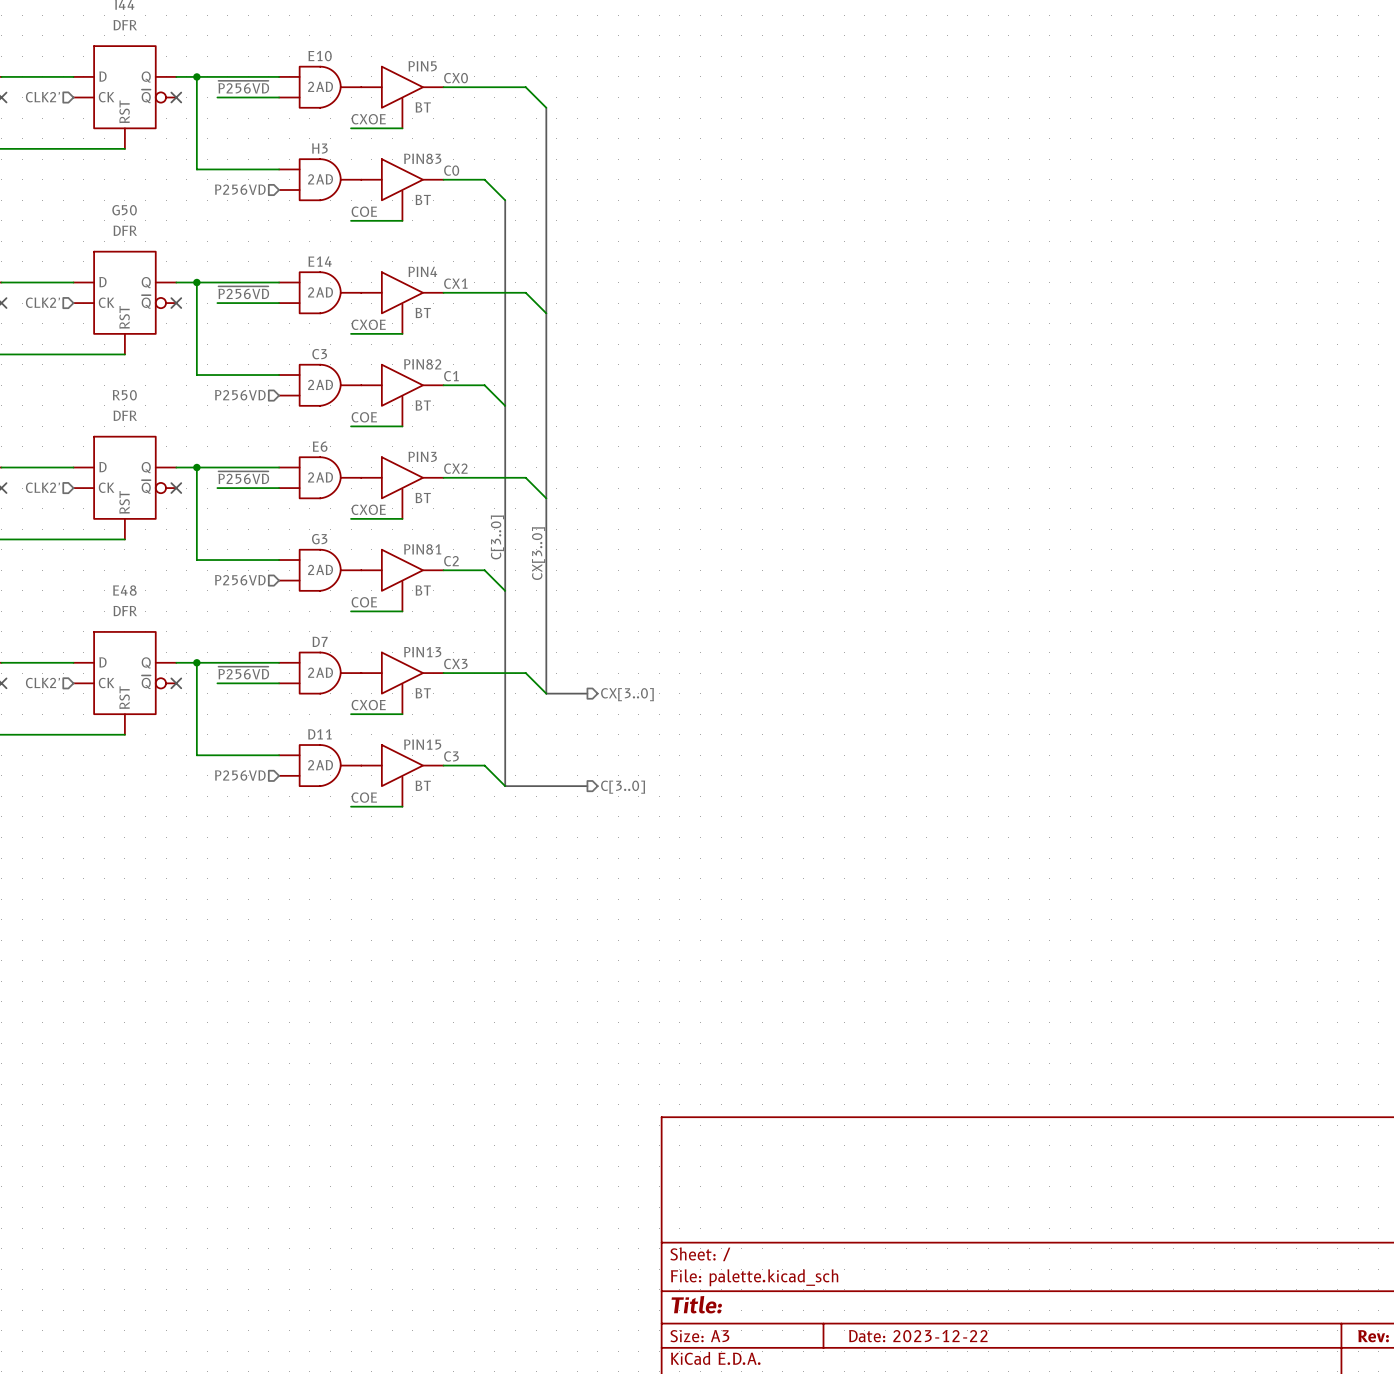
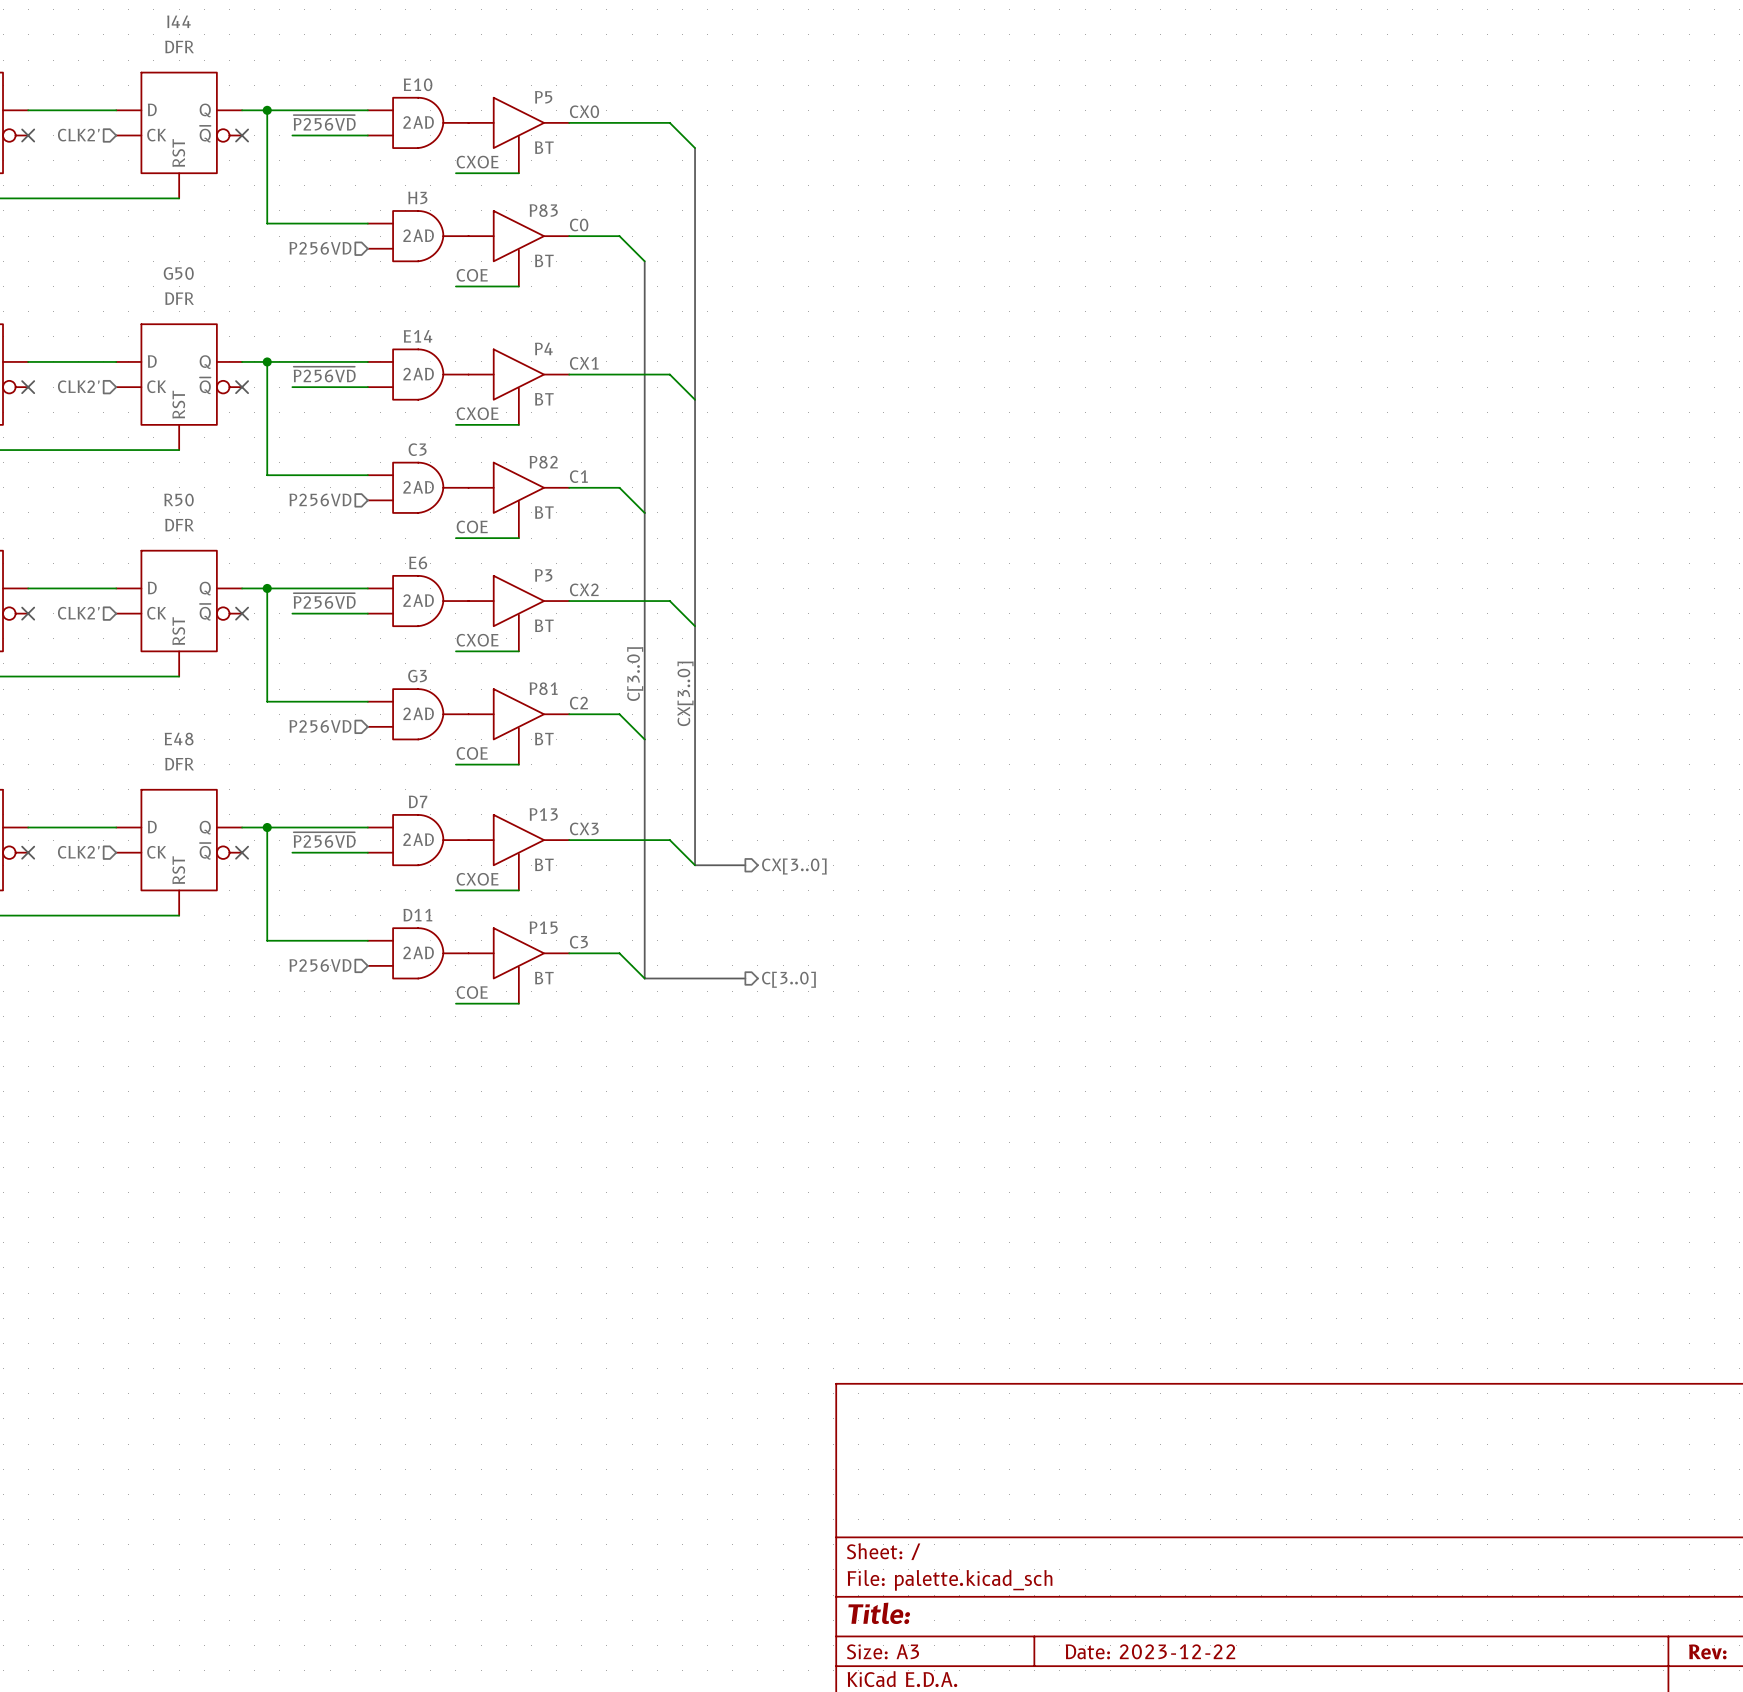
PIN5 name: PIN5 (422, 66) -> P5 (543, 97)
PIN83 name: PIN83 (422, 158) -> P83 (543, 210)
PIN4 name: PIN4 (422, 271) -> P4 (543, 348)
PIN82 name: PIN82 (422, 364) -> P82 (543, 462)
PIN3 name: PIN3 (422, 456) -> P3 (543, 575)
PIN81 name: PIN81 (422, 549) -> P81 (543, 688)
PIN13 name: PIN13 (422, 652) -> P13 (543, 814)
PIN15 name: PIN15 (422, 744) -> P15 (543, 927)

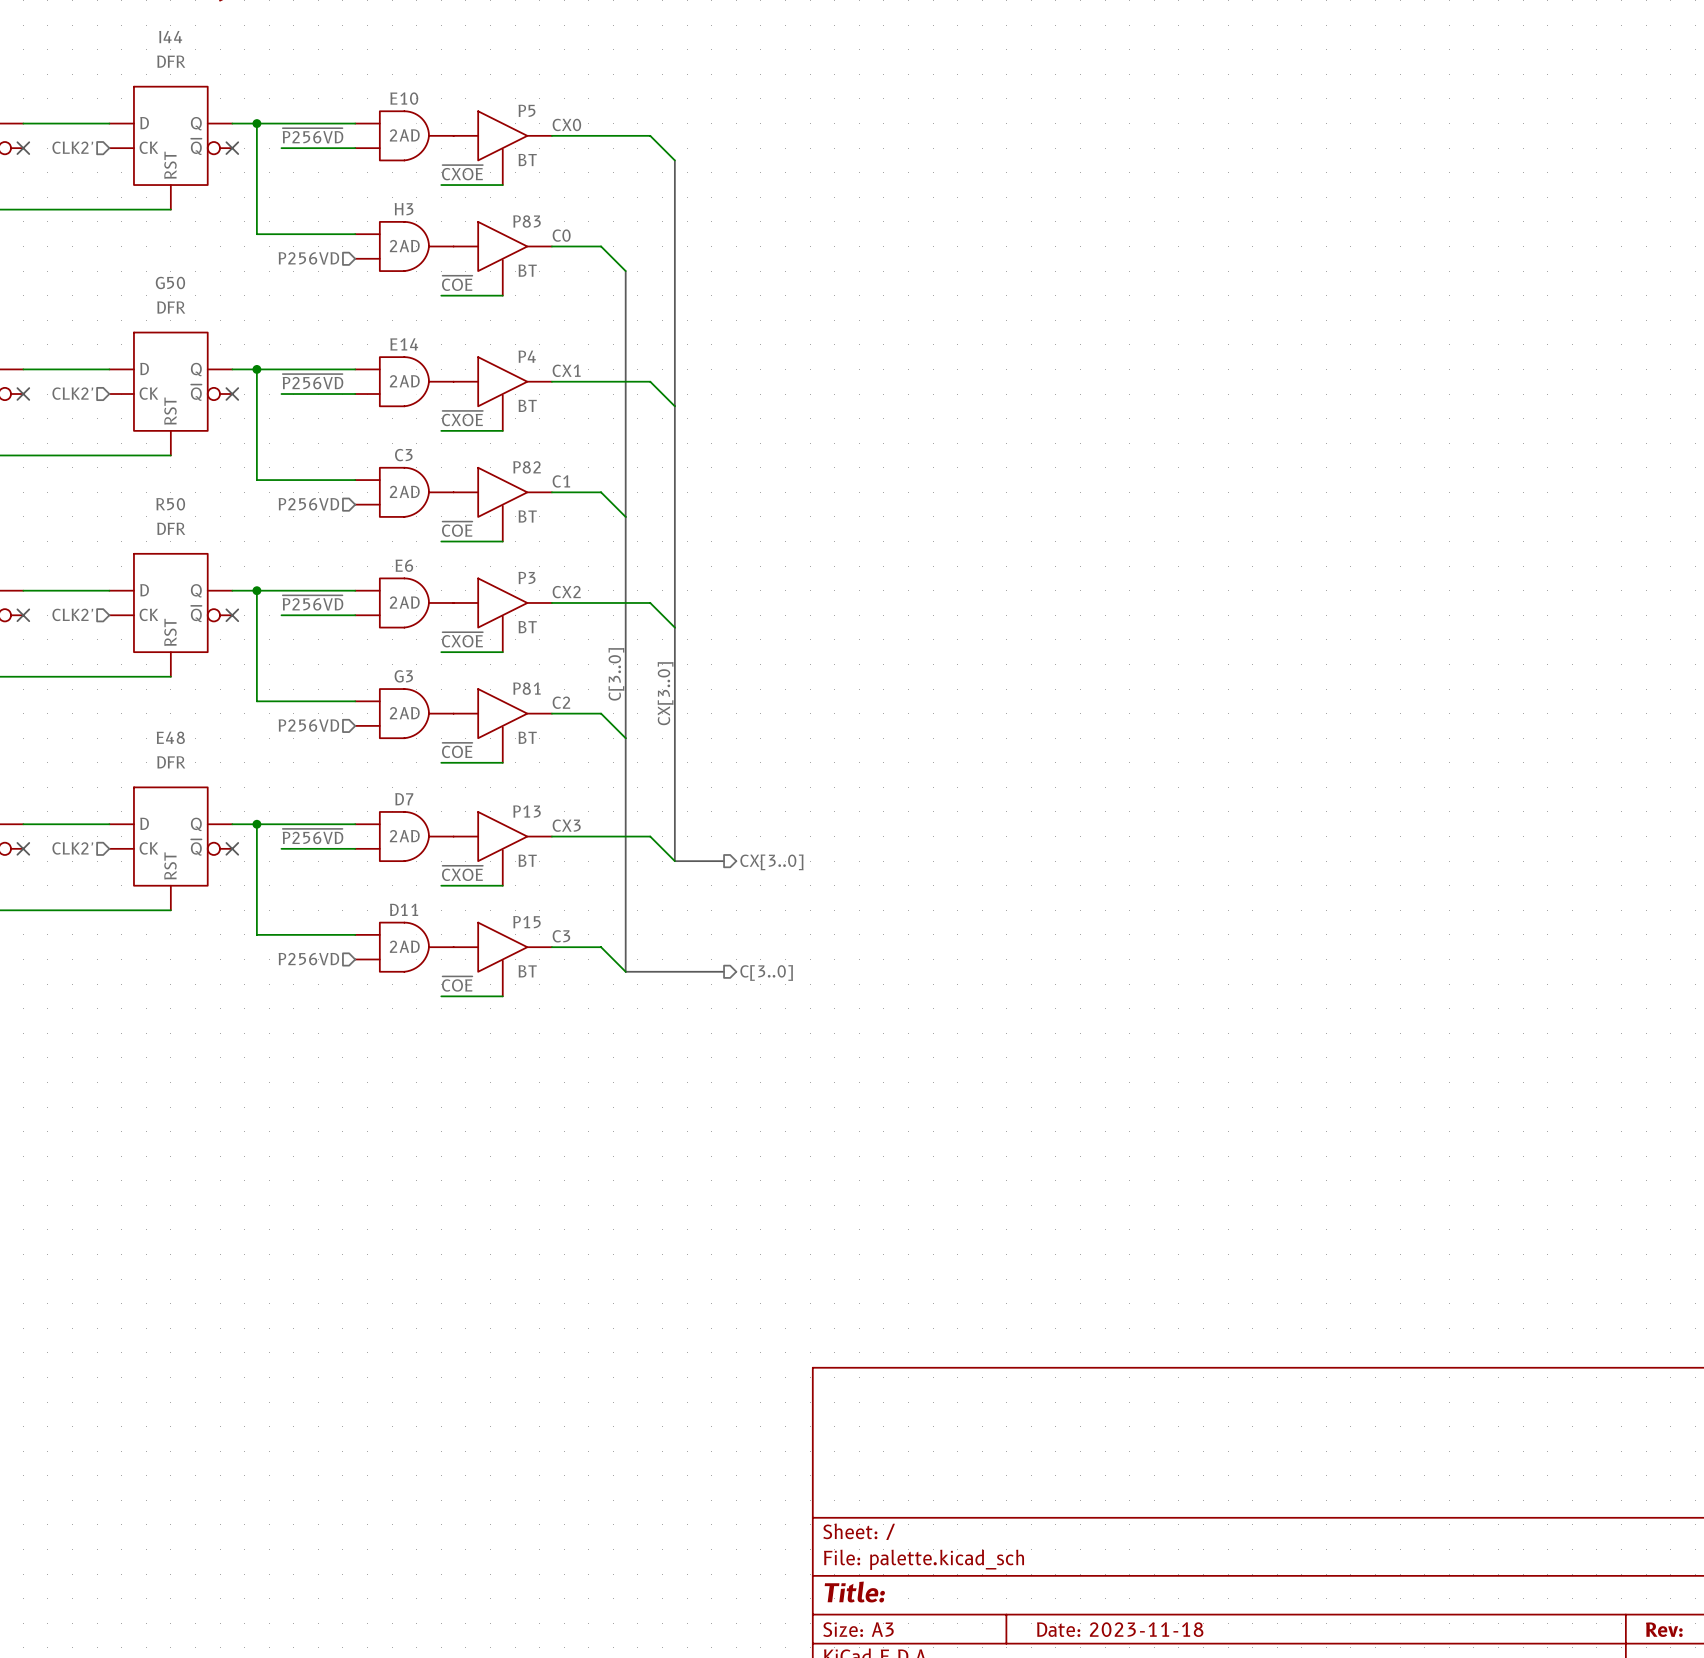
label: CXOE (477, 162) -> ~{CXOE} (462, 172)
label: COE (472, 275) -> ~{COE} (457, 283)
label: CXOE (477, 413) -> ~{CXOE} (462, 418)
label: COE (472, 526) -> ~{COE} (457, 529)
label: CXOE (477, 640) -> ~{CXOE} (462, 639)
label: COE (472, 753) -> ~{COE} (457, 750)
label: CXOE (477, 879) -> ~{CXOE} (462, 873)
label: COE (472, 992) -> ~{COE} (457, 984)
title block: Date: 2023-12-22 (1150, 1651) -> Date: 2023-11-18 (1120, 1629)

